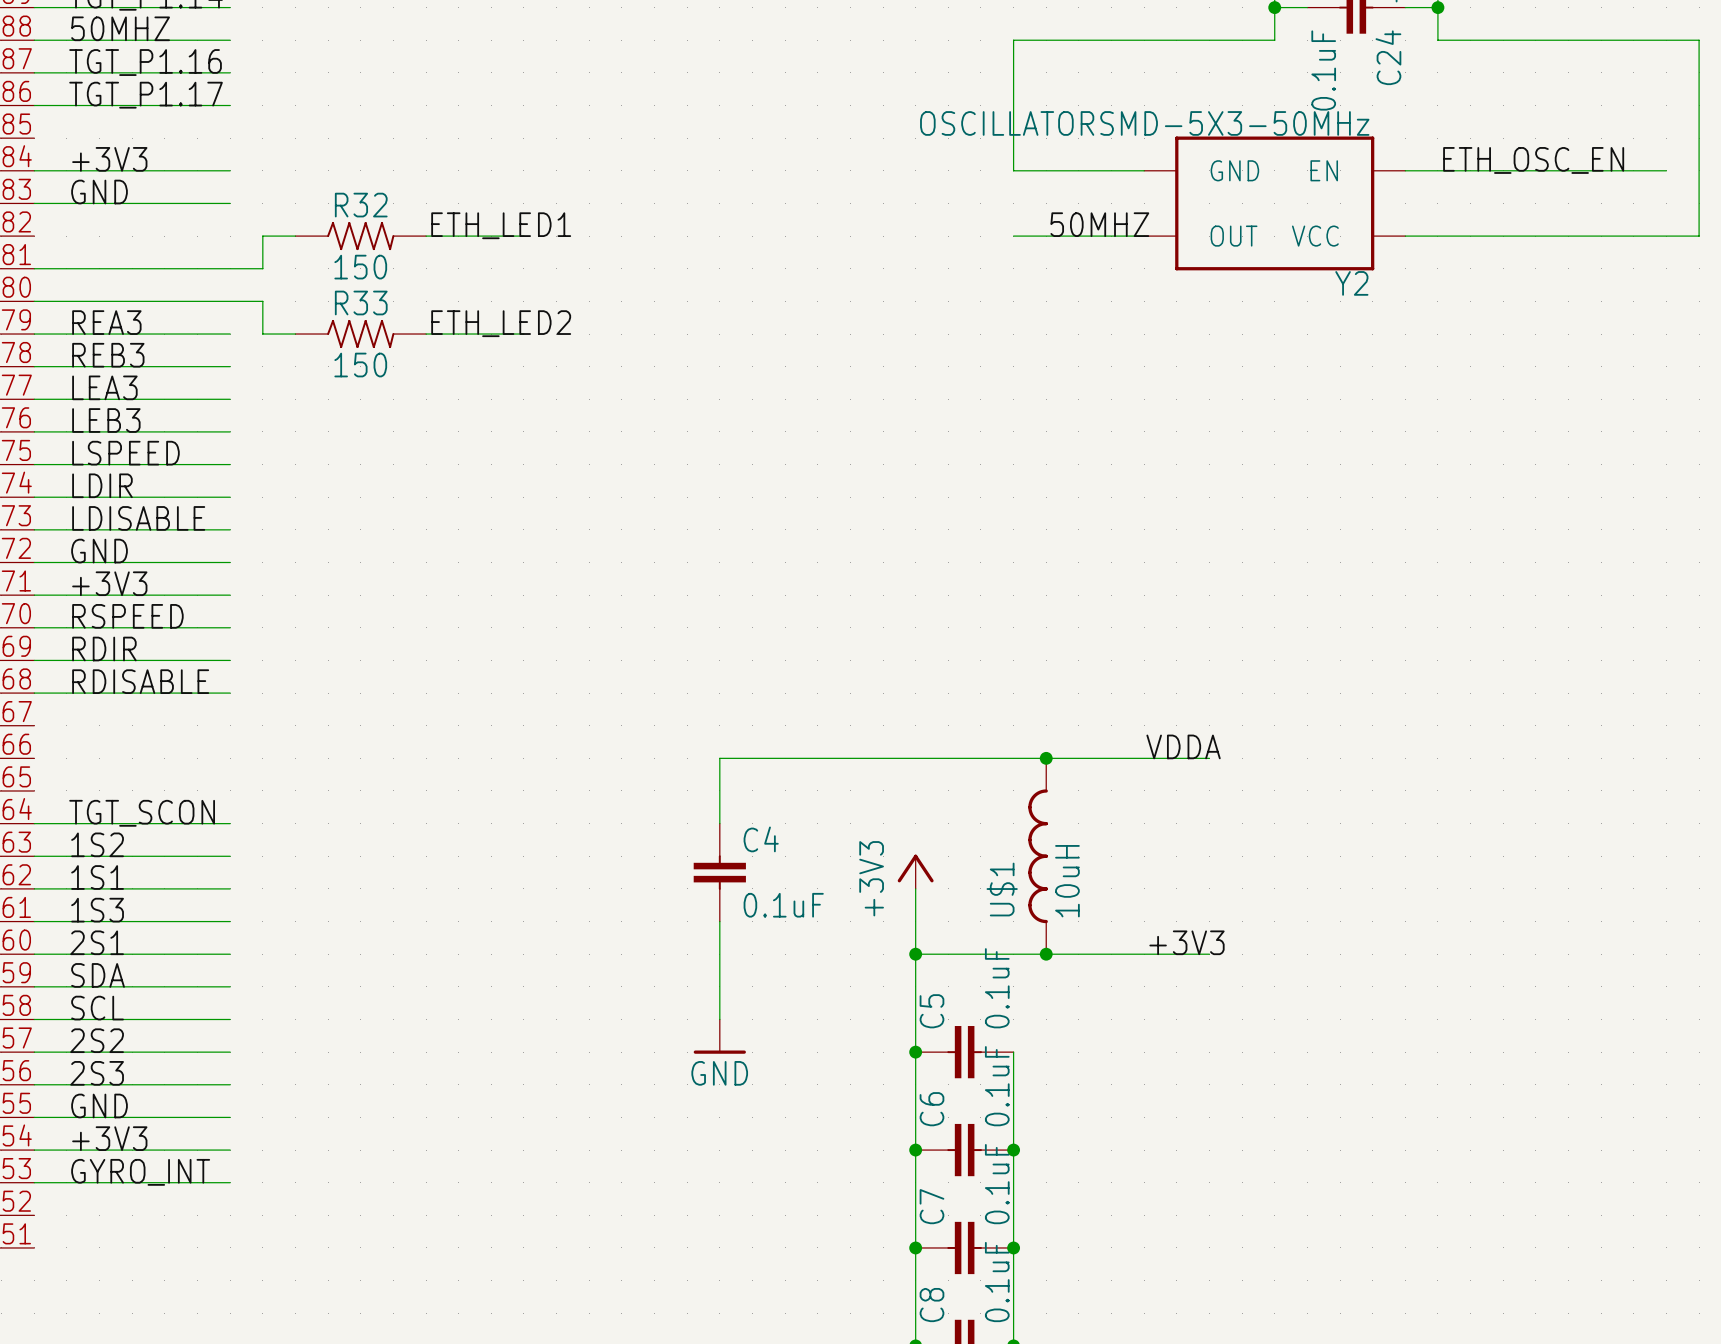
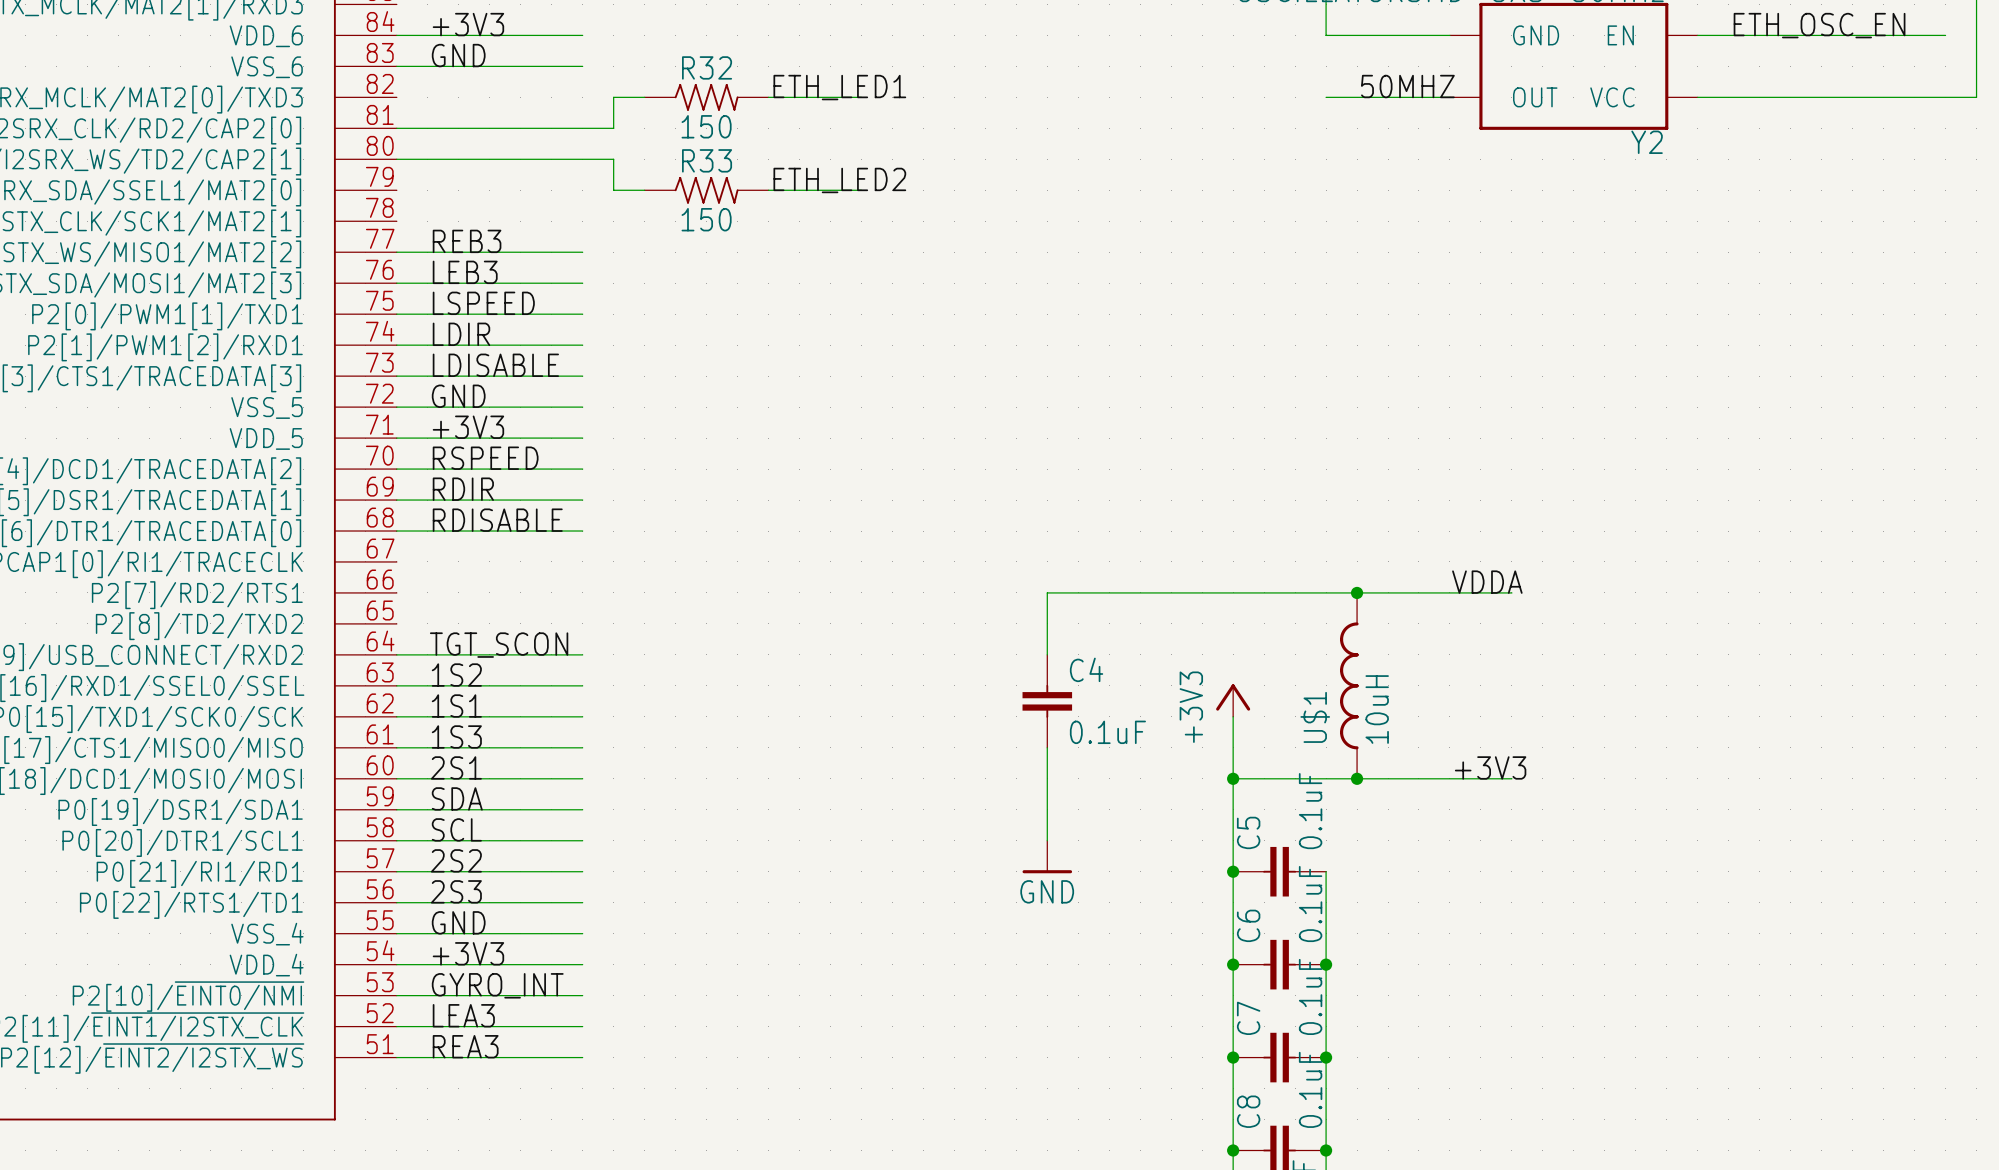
label: REA3 (106, 322) -> none
wire: (34, 334) (230, 334) -> none
label: REB3 (108, 355) -> none
wire: (34, 366) (230, 366) -> none
label: LEA3 (104, 387) -> REB3 (467, 241)
label: none -> LEA3 (463, 1015)
wire: none -> (396, 1026) (582, 1026)
label: none -> REA3 (465, 1046)
wire: none -> (396, 1057) (582, 1057)

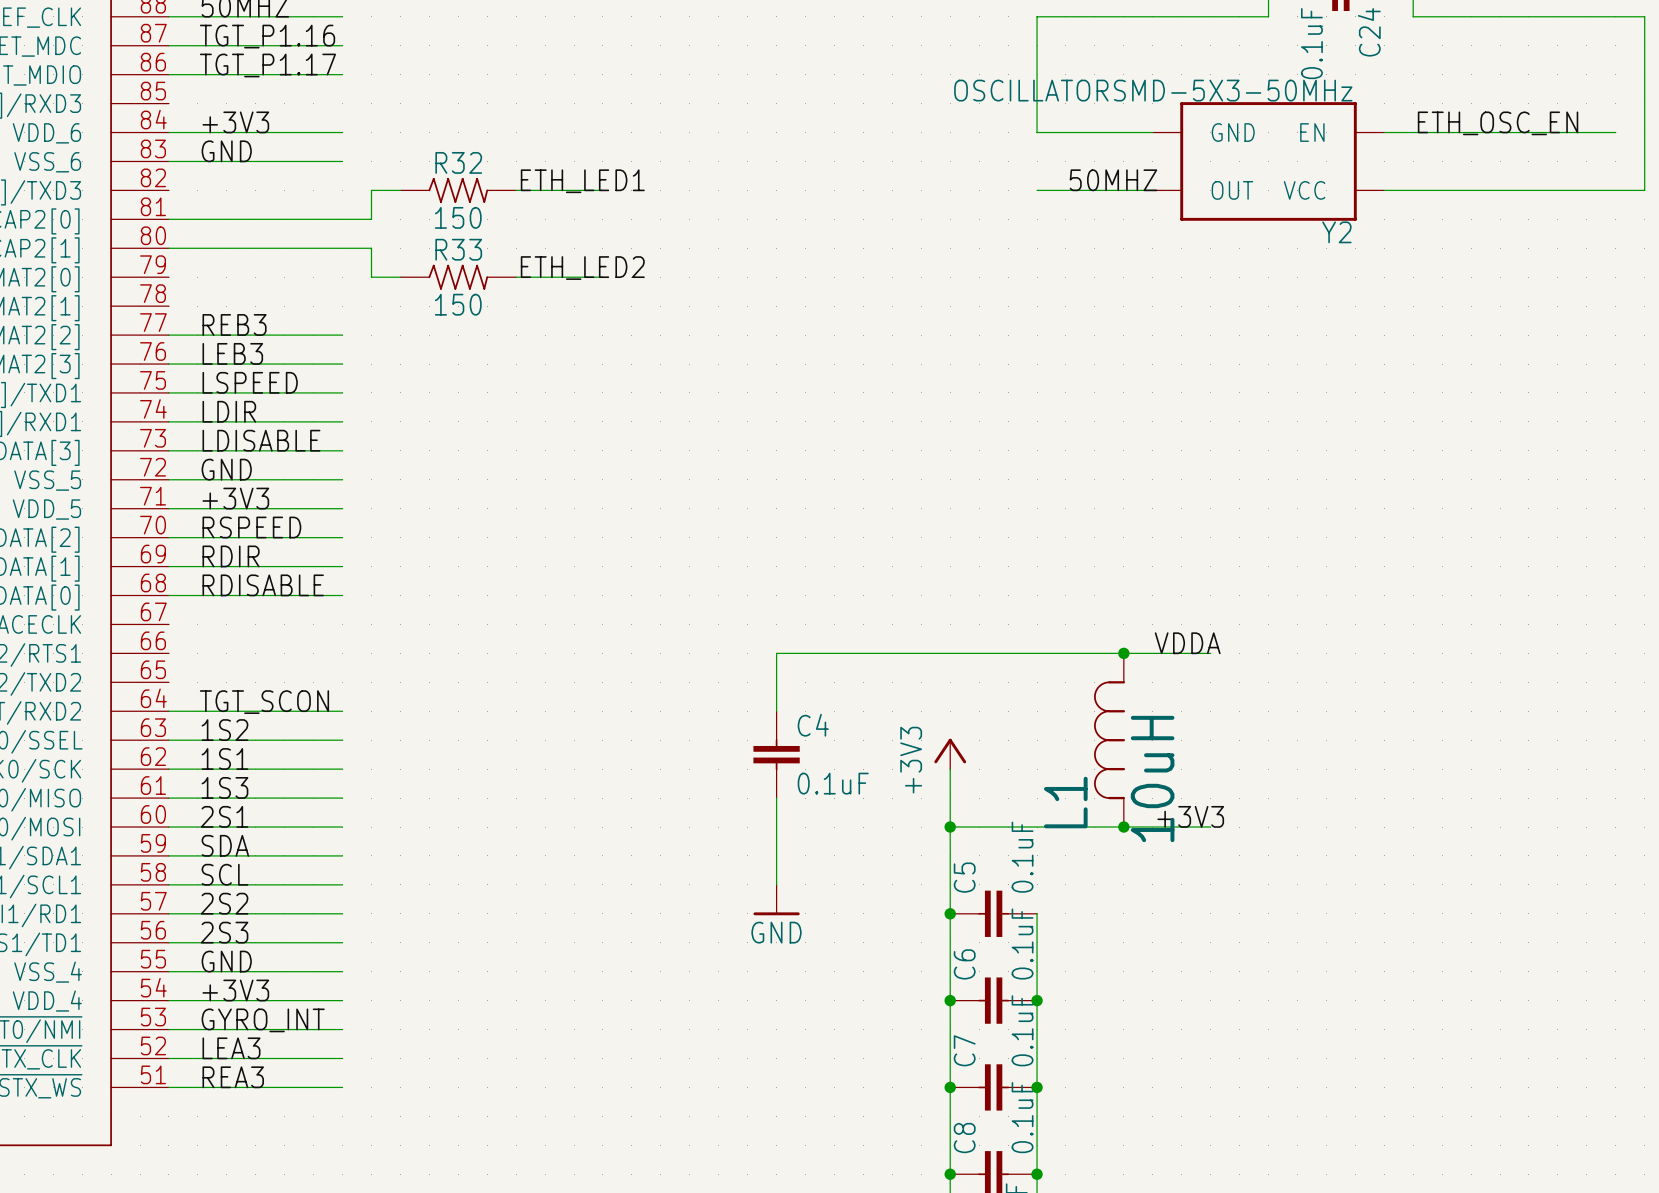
junction position: (1357, 592) -> (1123, 653)
U$1: 10uH (1349, 685) -> none
L1: none -> 10uH (1109, 740)
junction position: (1357, 778) -> (1123, 827)

